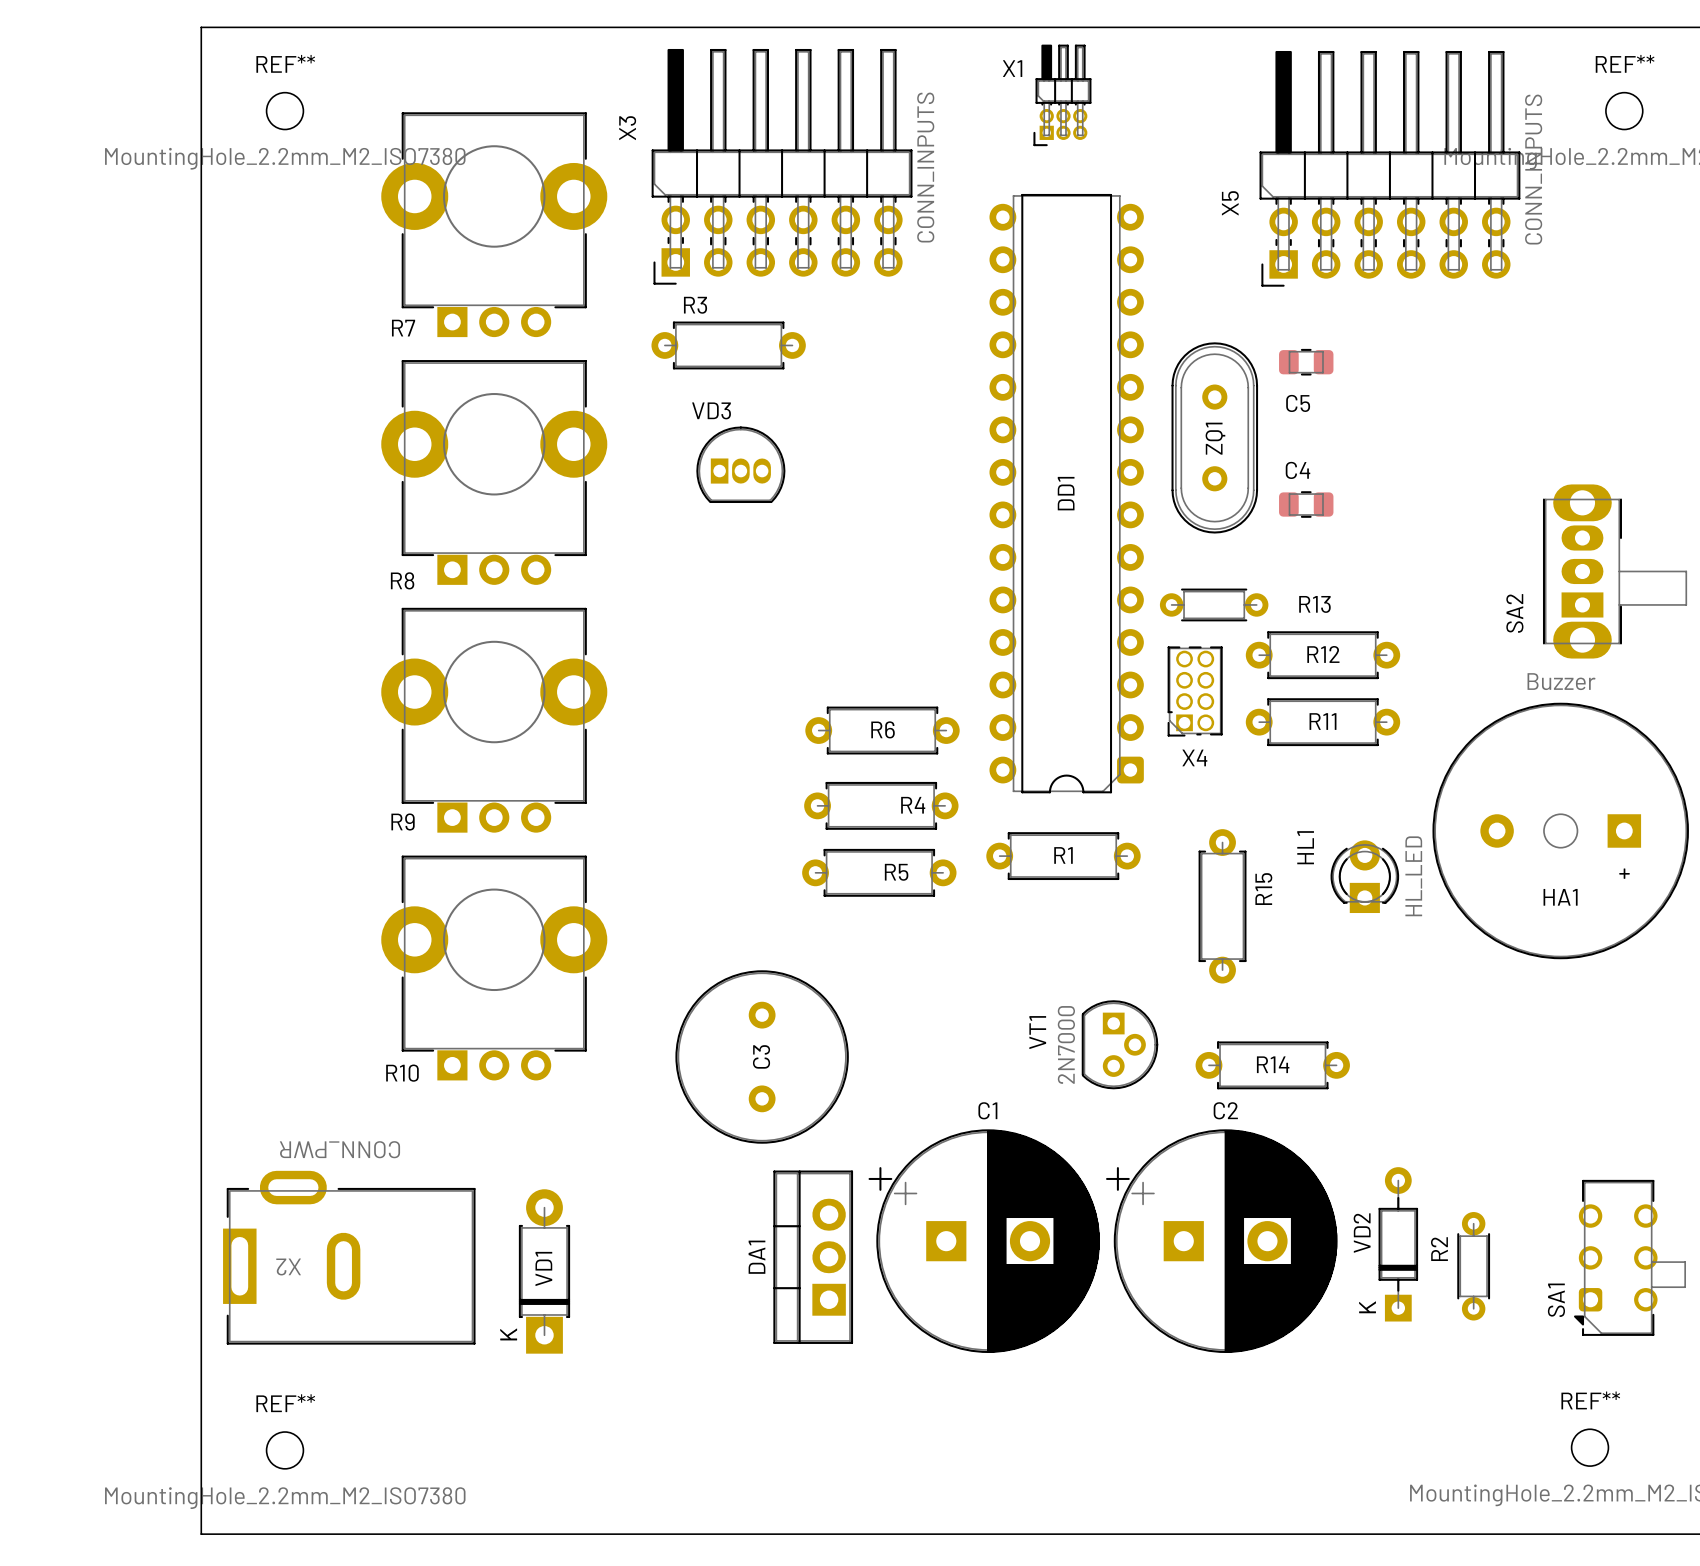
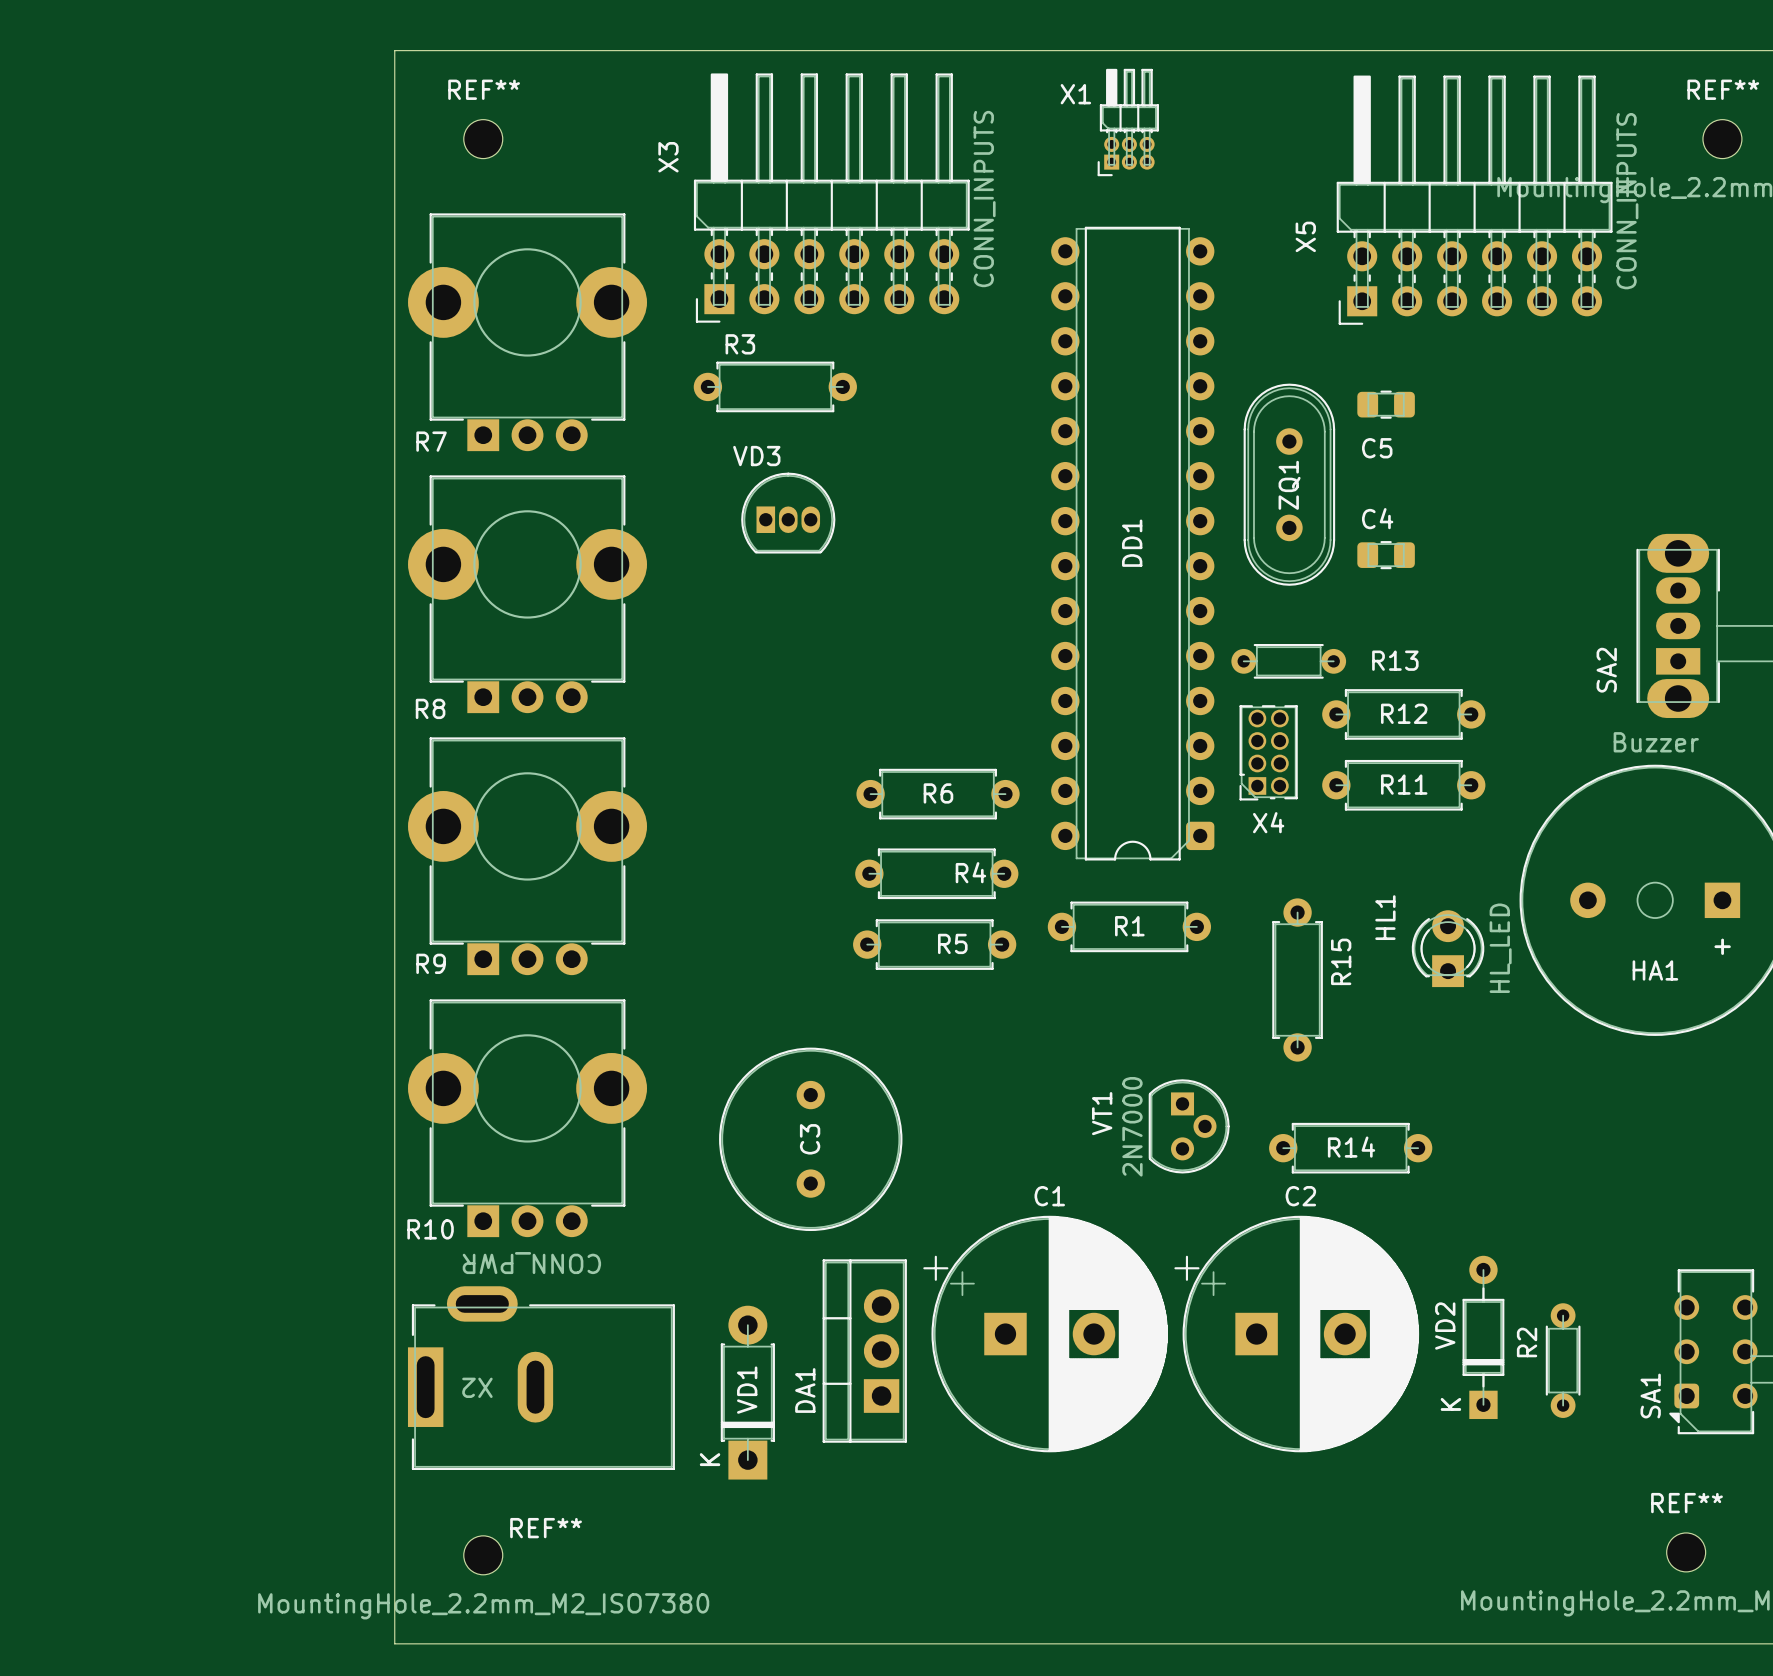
board edge: (368, 27) (201, 27) (201, 1534) (368, 1534) -> (394, 50) (394, 1643)
REF**: MountingHole_2.2mm_M2_ISO7380 (284, 111) -> none
REF**: none -> (483, 139)
R7 position: (494, 224) -> (527, 332)
R8 position: (494, 472) -> (527, 594)
R9 position: (494, 720) -> (527, 856)
R10 position: (494, 968) -> (527, 1118)
X2 position: (349, 1257) -> (541, 1378)
DA1 name position: DA1 (756, 1257) -> DA1 (805, 1390)
VD1 position: (544, 1271) -> (747, 1392)
REF** name position: REF** (285, 1403) -> REF** (546, 1528)
REF** position: (284, 1450) -> (483, 1555)

